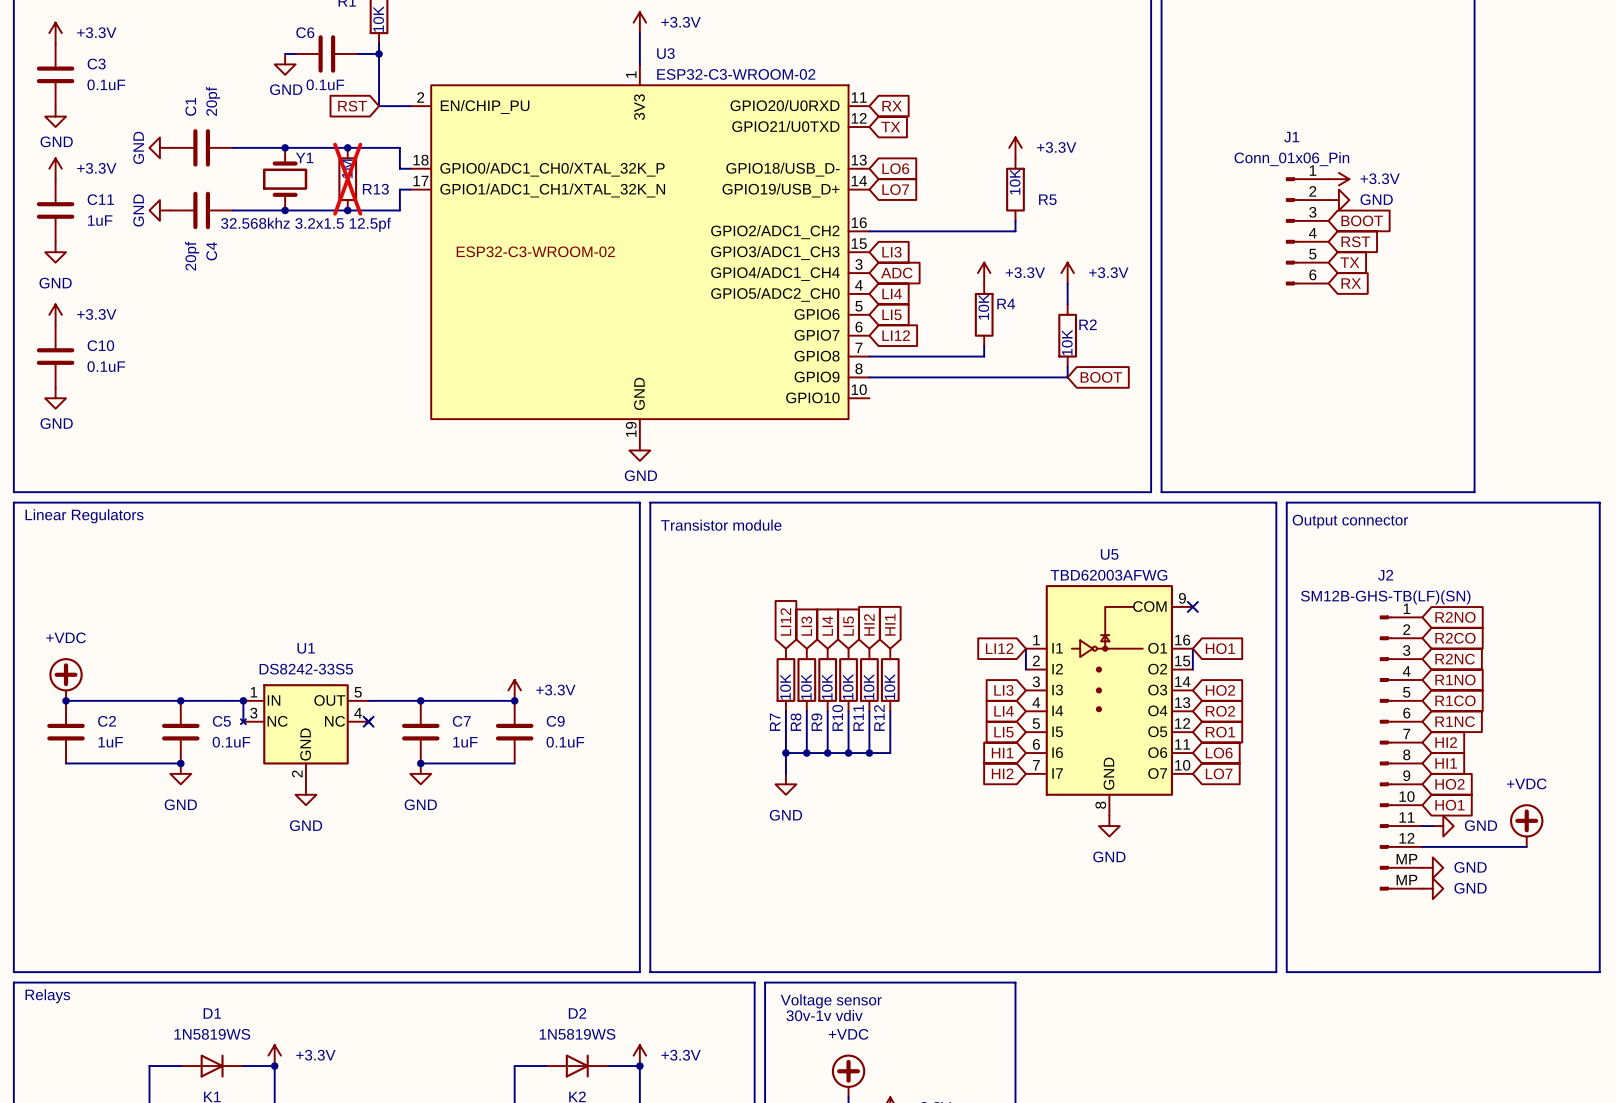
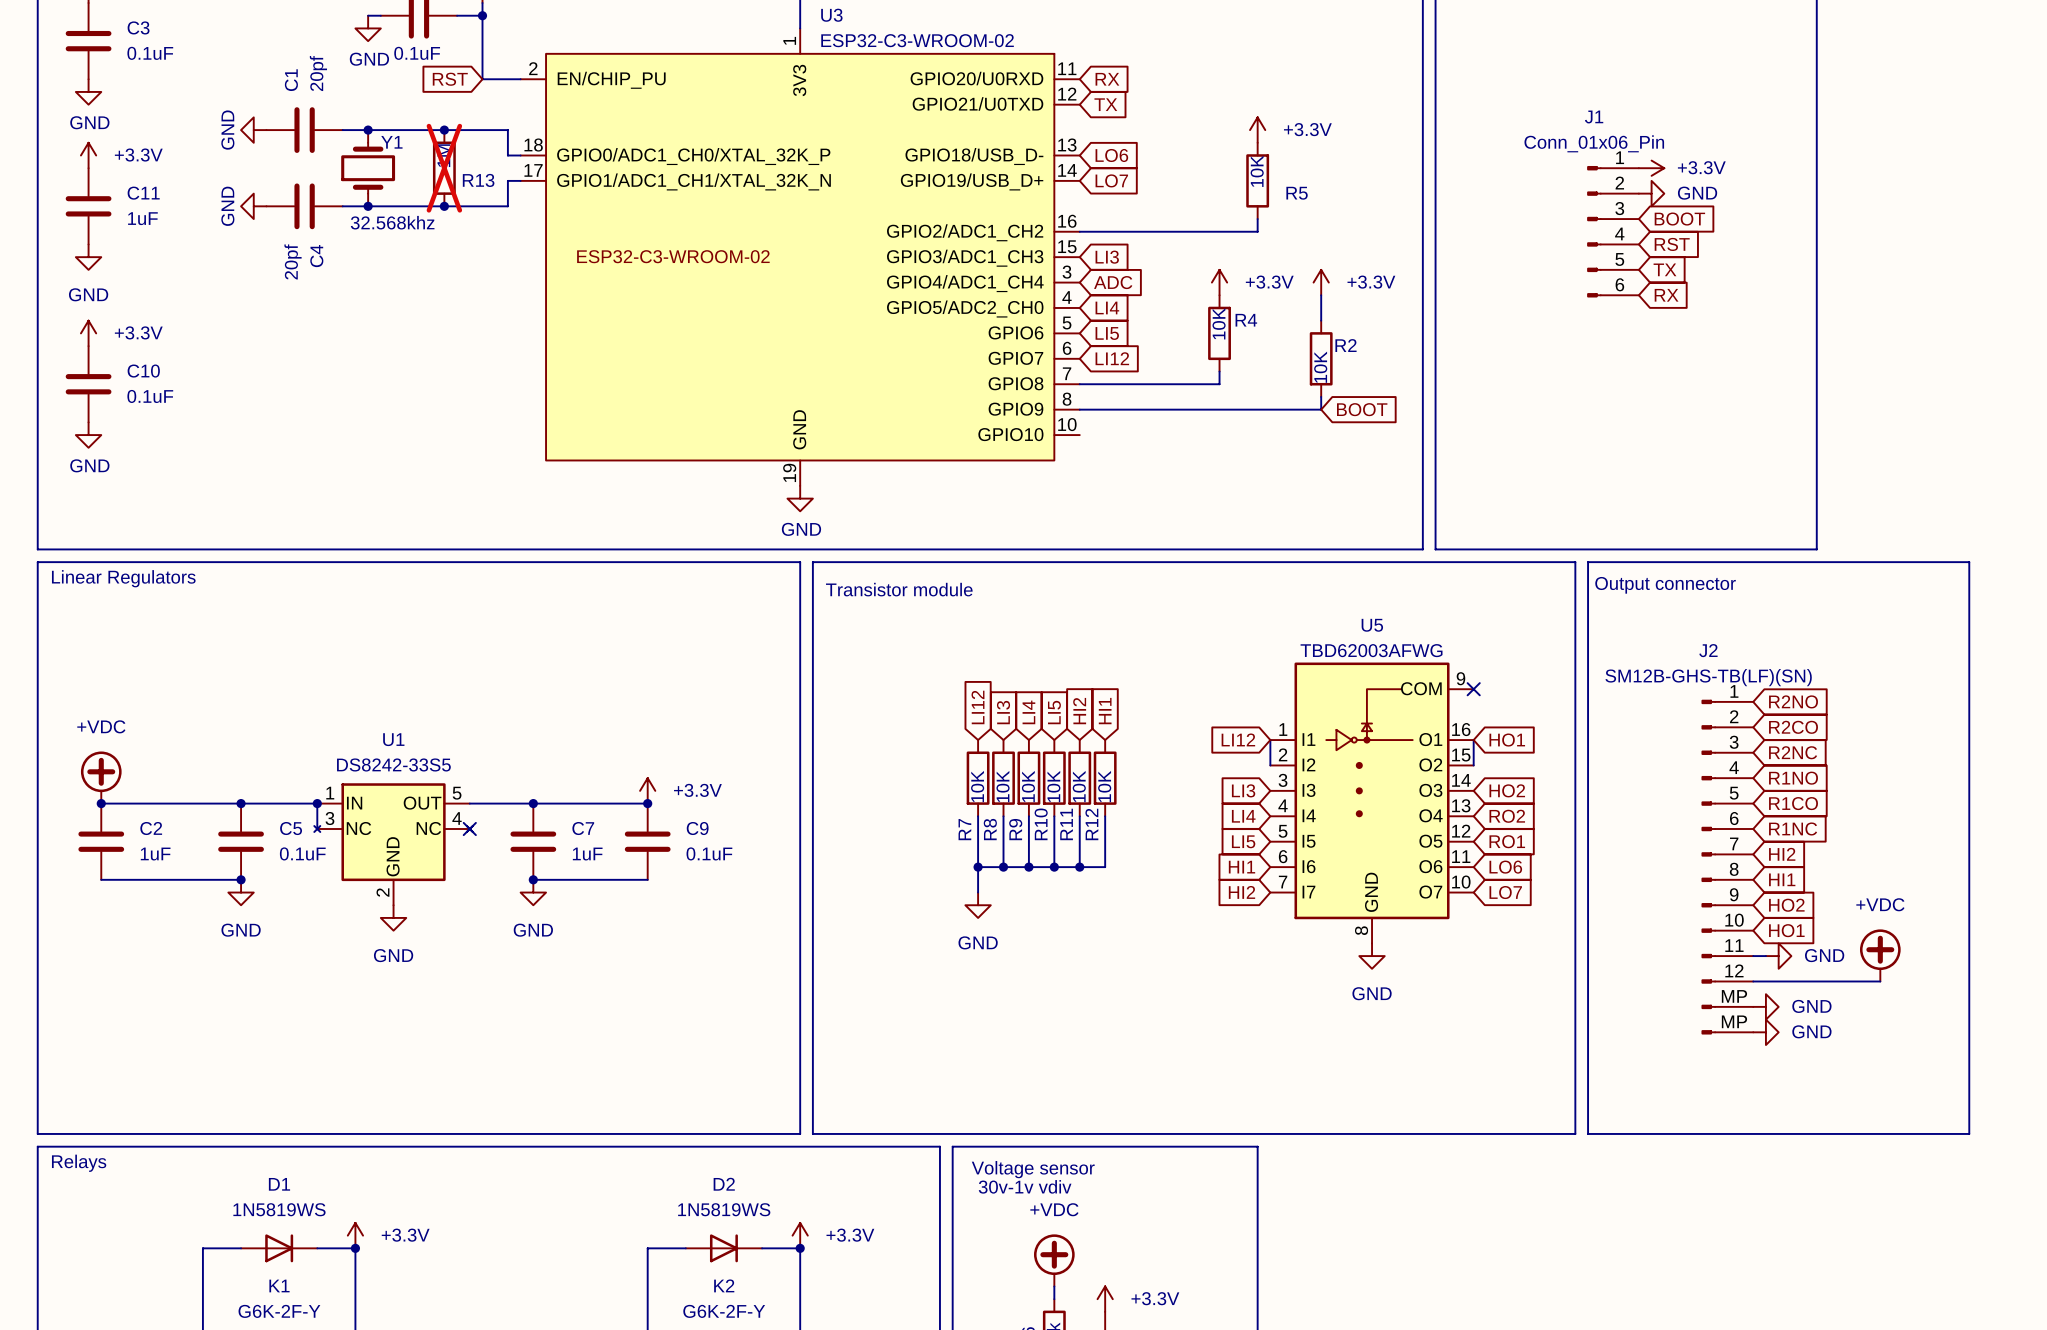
power symbol position: GND (159, 147) -> GND (253, 130)
C1 position: (201, 147) -> (304, 130)
power symbol position: GND (159, 210) -> GND (253, 206)
C4 position: (201, 210) -> (304, 206)
Y1 value: 32.568khz 3.2x1.5 12.5pf (305, 224) -> 32.568khz (392, 222)

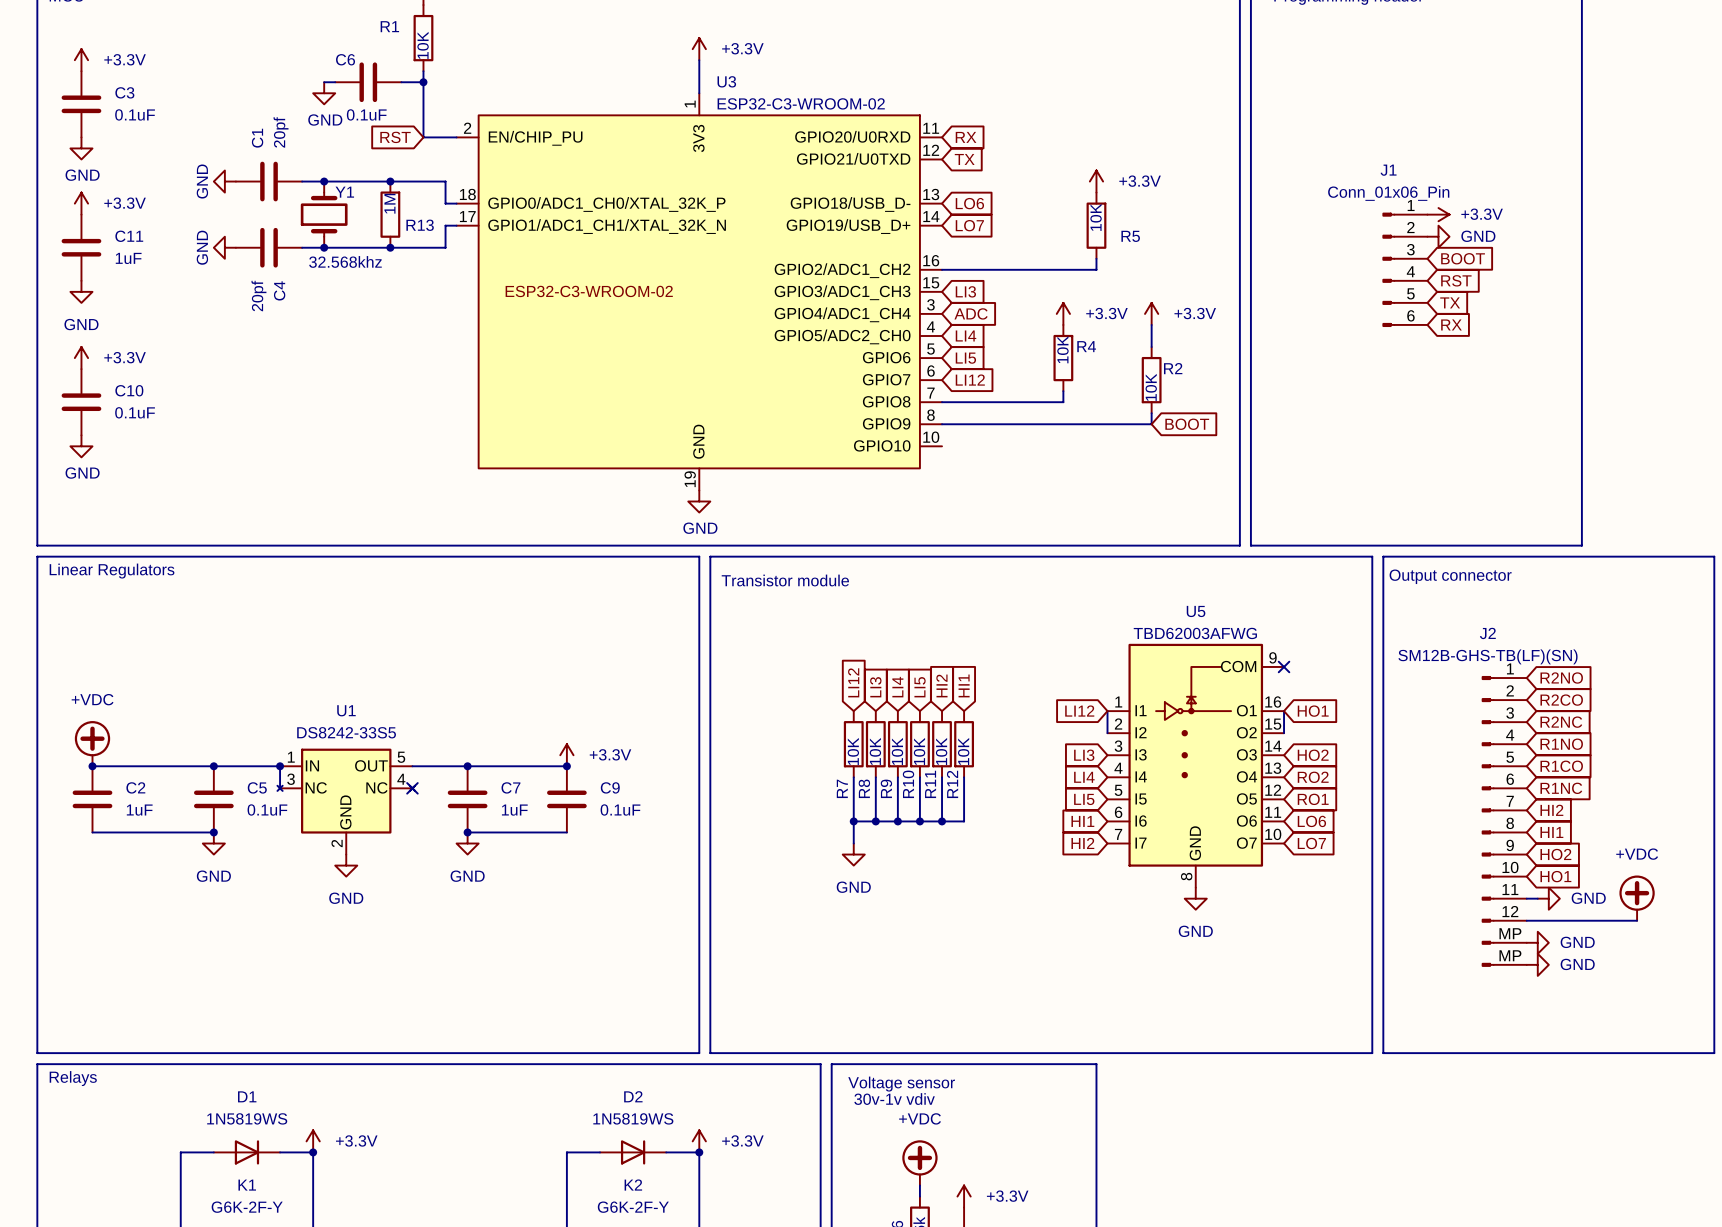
R13 do-not-place cross: (444, 168) -> none

